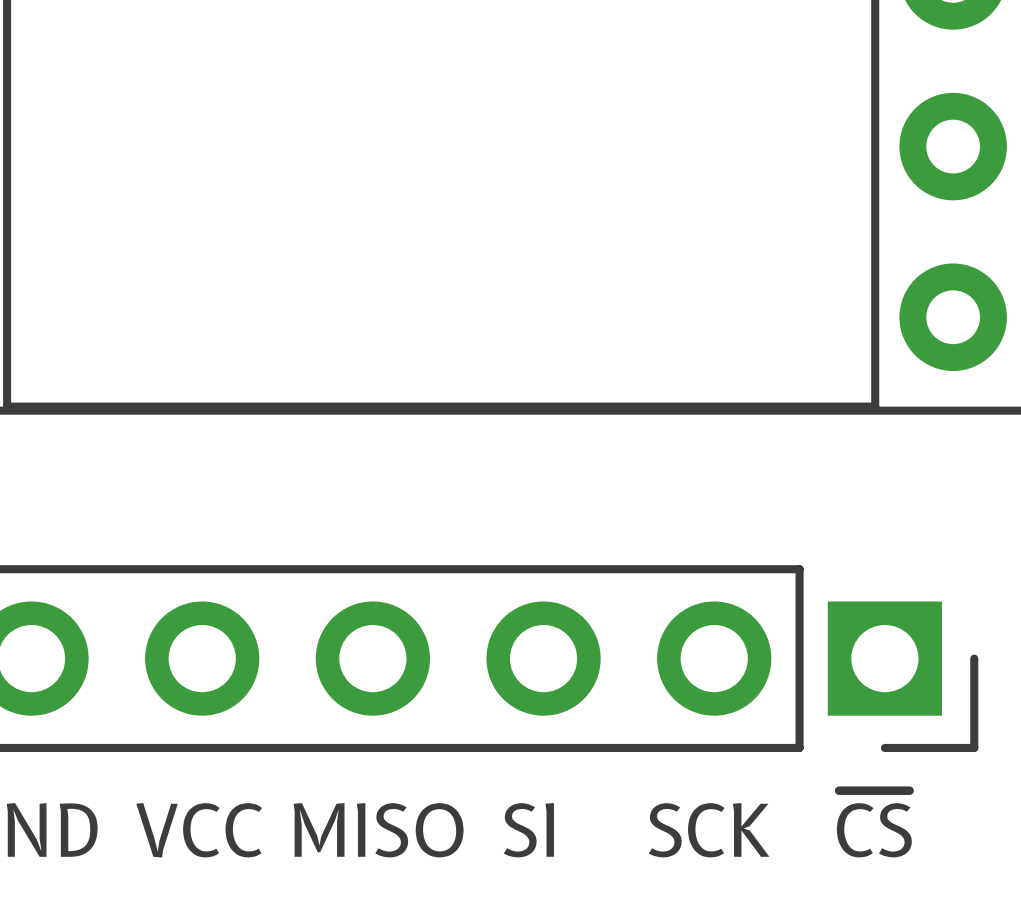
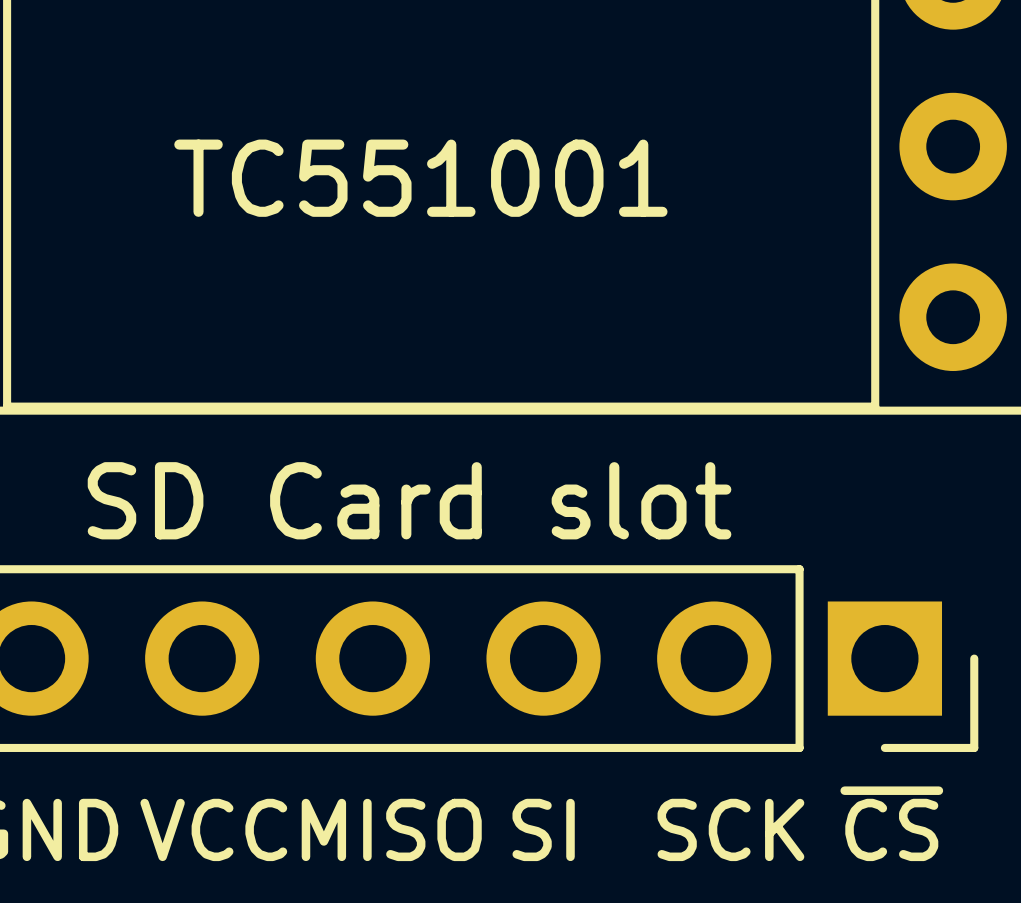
part value: none -> TC551001 (420, 178)
part value: none -> SD Card slot (409, 500)

